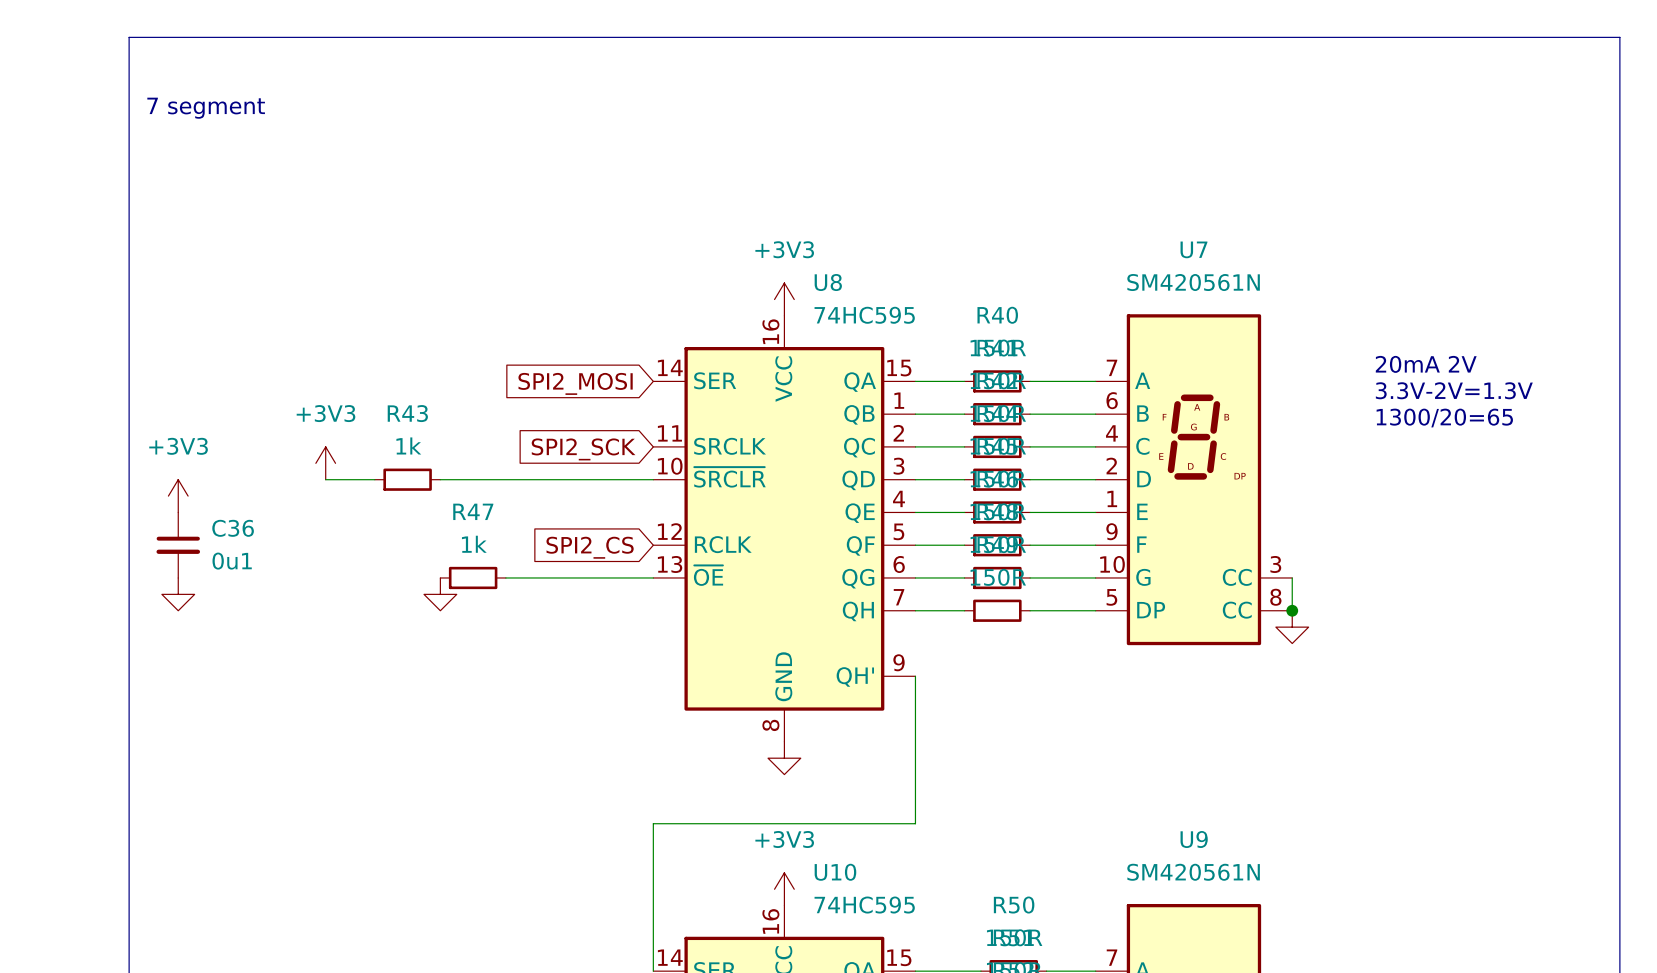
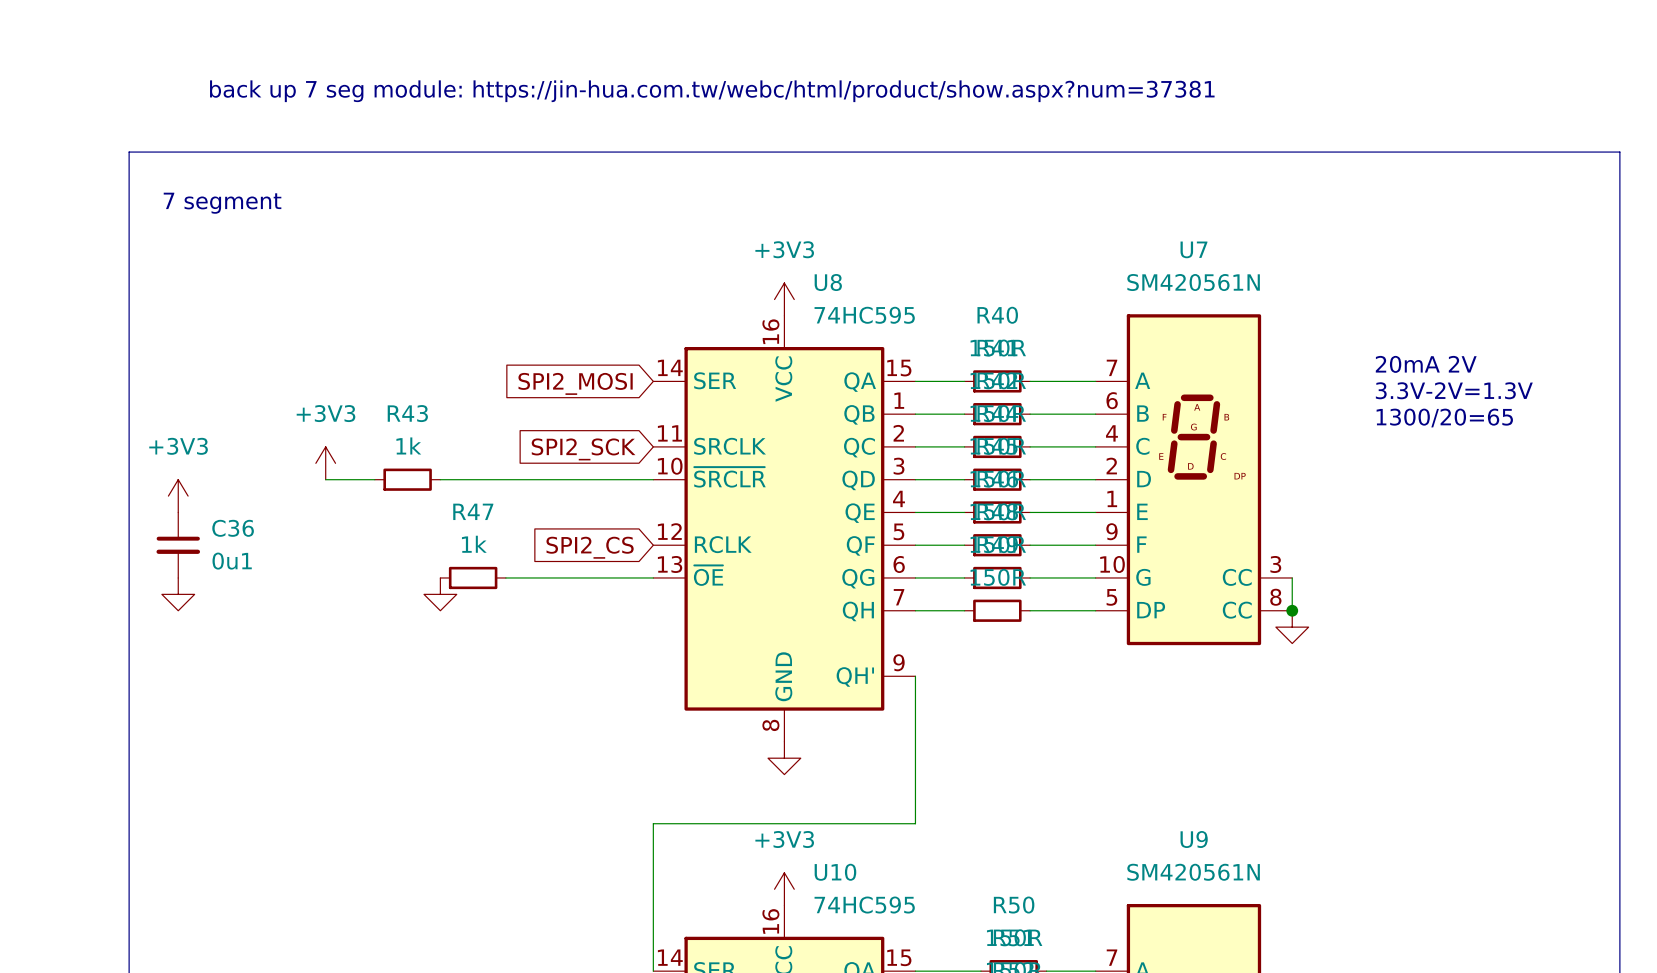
text: none -> back up 7 seg module: https://jin-hua.com.tw/webc/html/product/show.aspx?num=37381 (712, 91)
text position: 7 segment (206, 108) -> 7 segment (222, 203)
line: (129, 152) (129, 37) (1619, 37) (1619, 152) -> (129, 152) (1619, 152)

